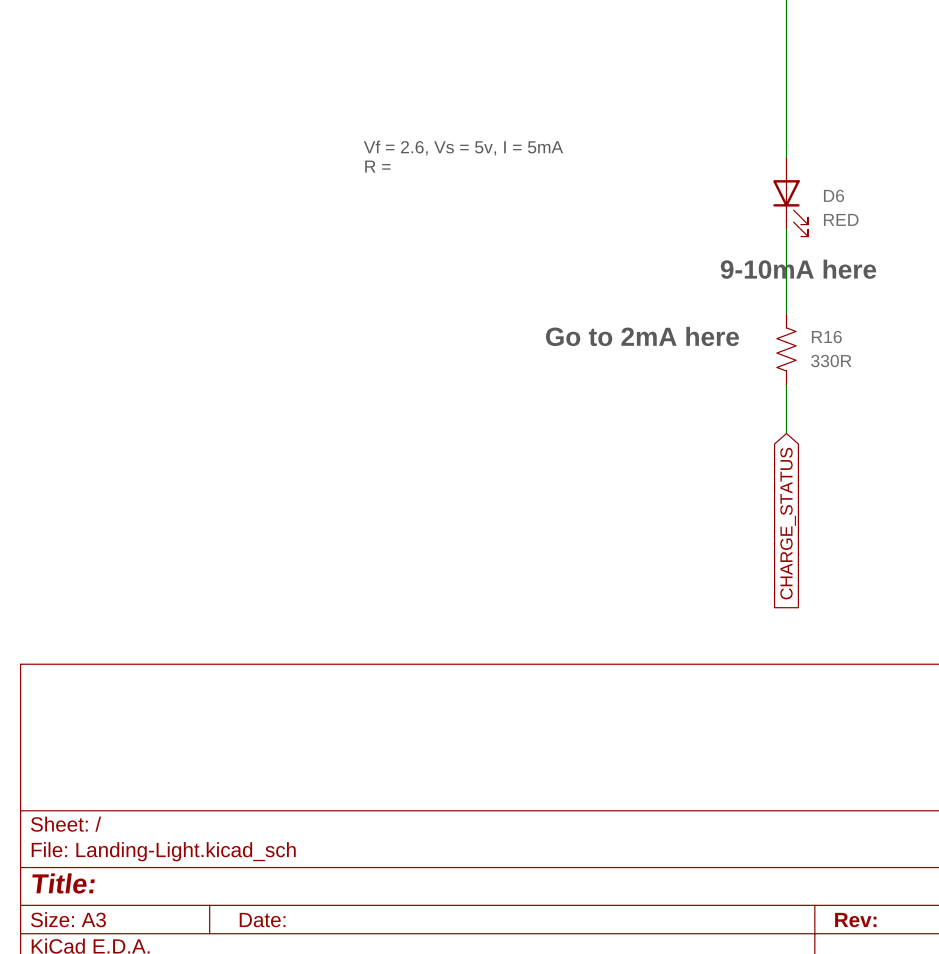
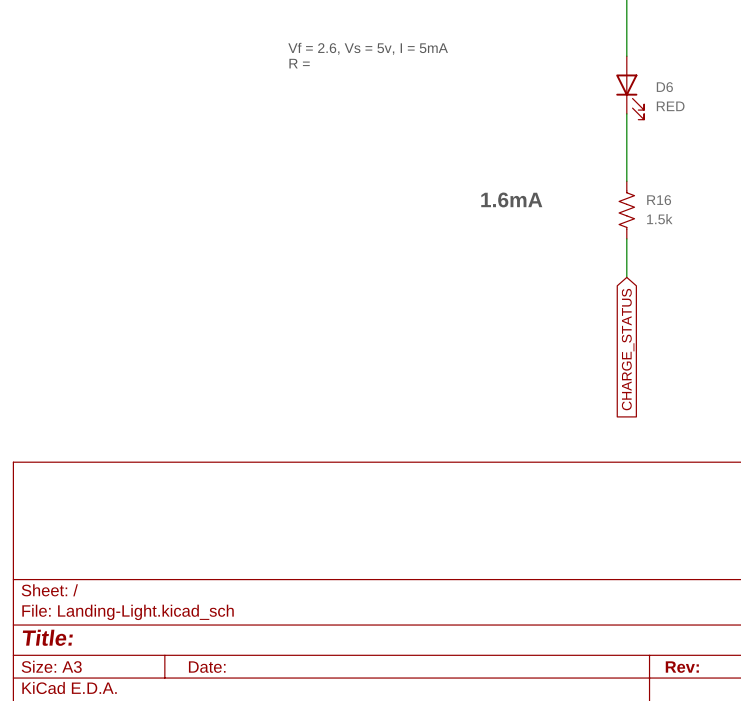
text: 9-10mA here (798, 269) -> none
text: Go to 2mA here (642, 336) -> 1.6mA (511, 199)
R16 value: 330R (831, 361) -> 1.5k (659, 219)

